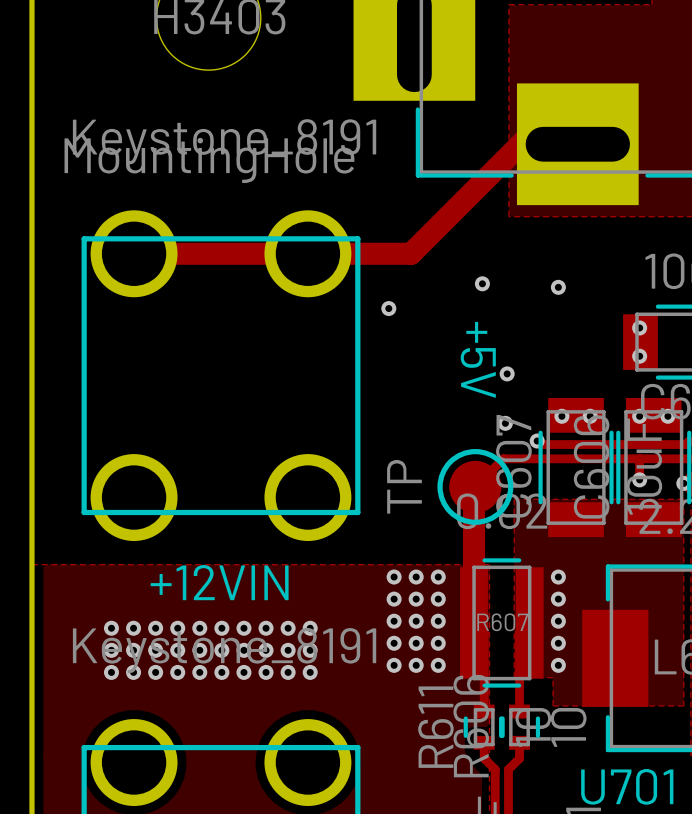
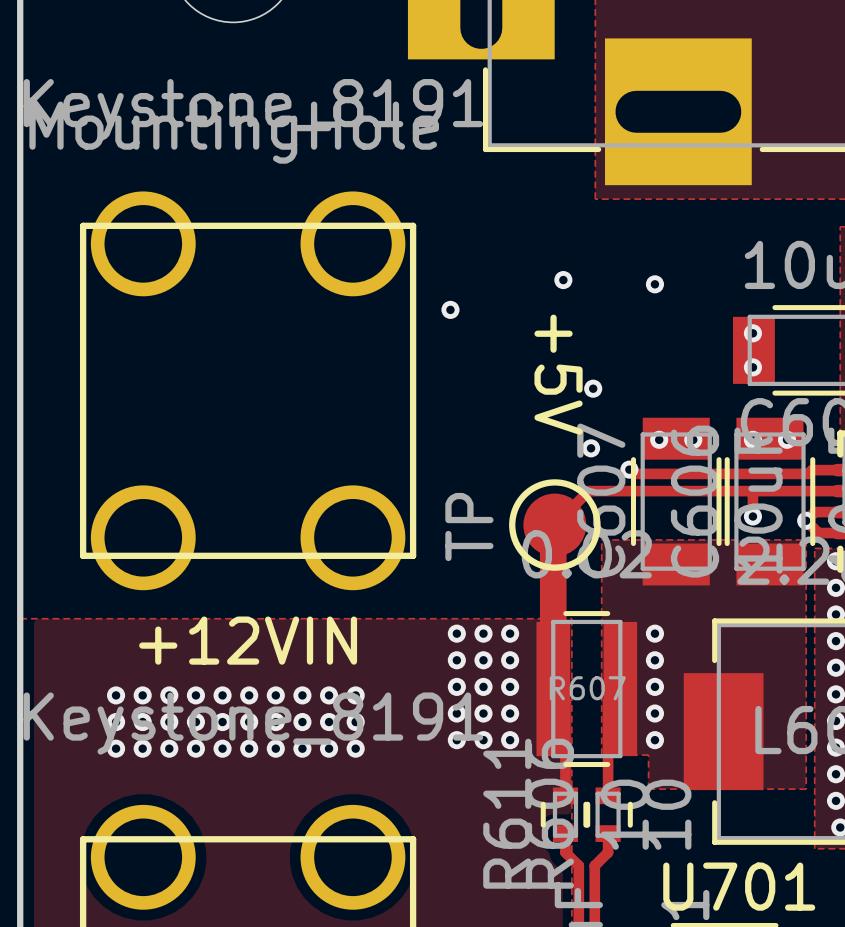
track: (530, 134) (411, 253) (134, 253) -> none

